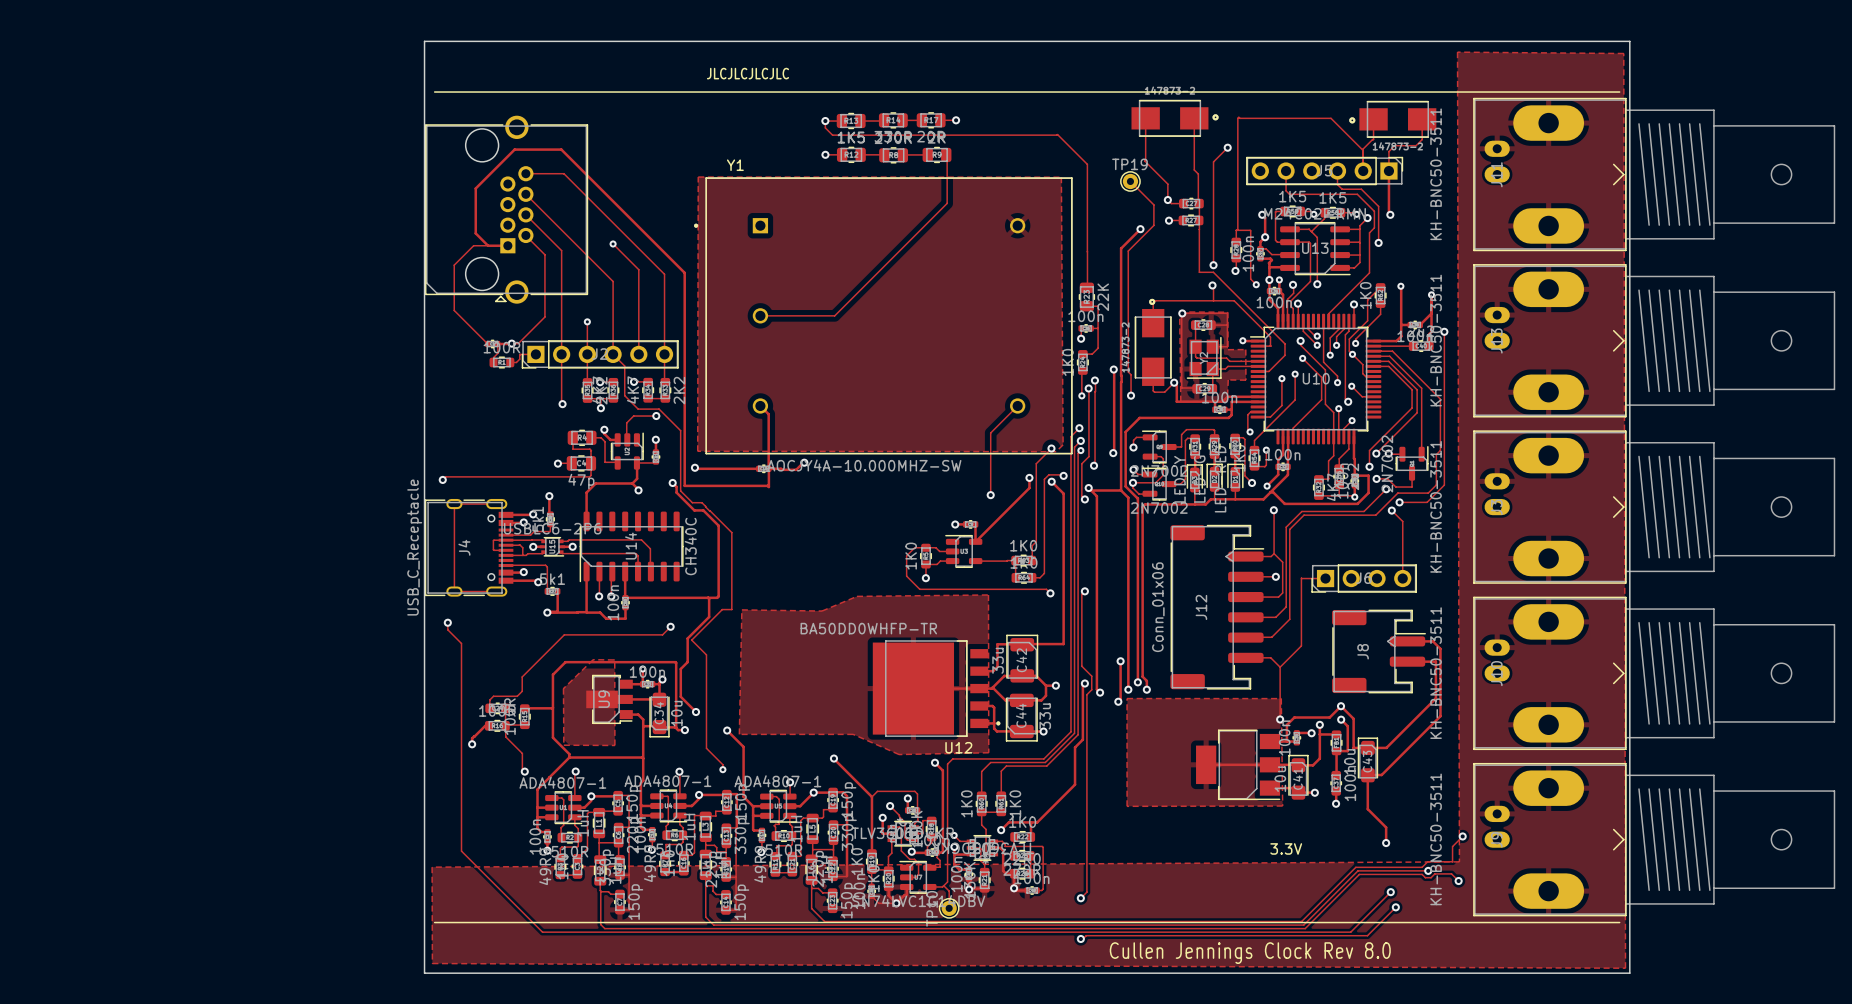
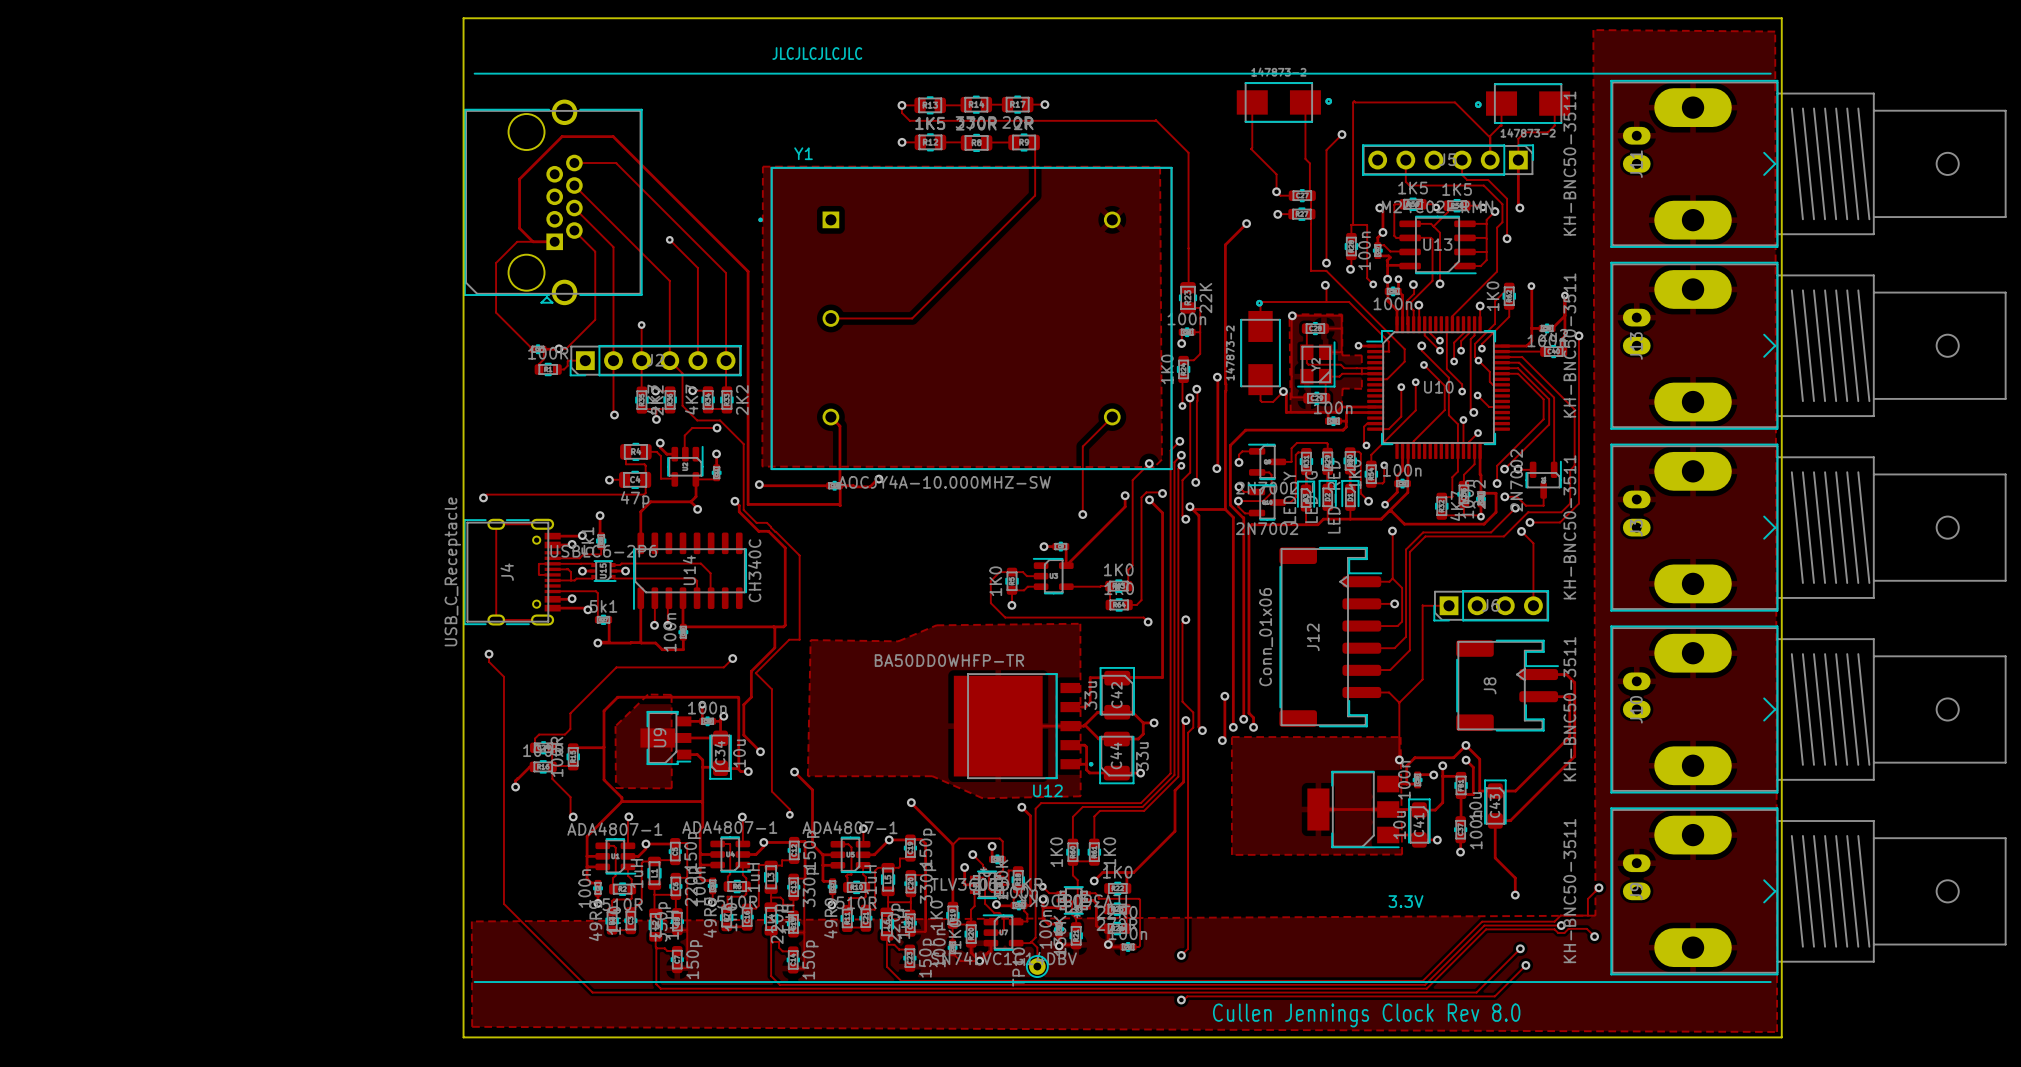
track: (1130, 181) (1153, 204) (1153, 225) (1128, 251) (1128, 371) (1131, 374) (1131, 395) -> none
TP19: (1130, 181) -> none
via: (1131, 395) -> none

